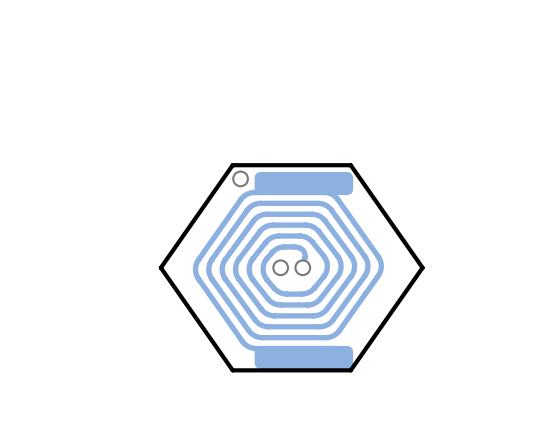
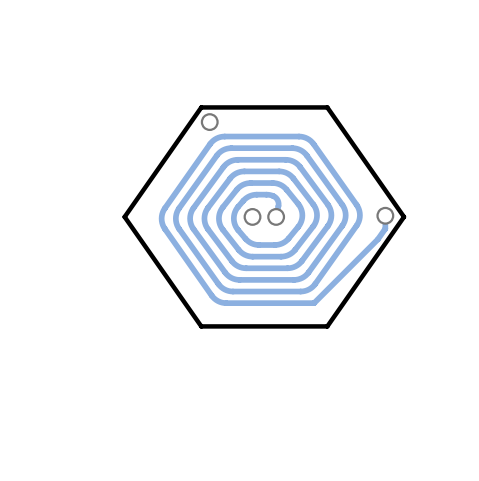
part: (303, 183) -> none
track: none -> (385, 215) (385, 228) (377, 239) (314, 303)
via: none -> (385, 215)
part: (303, 357) -> none

